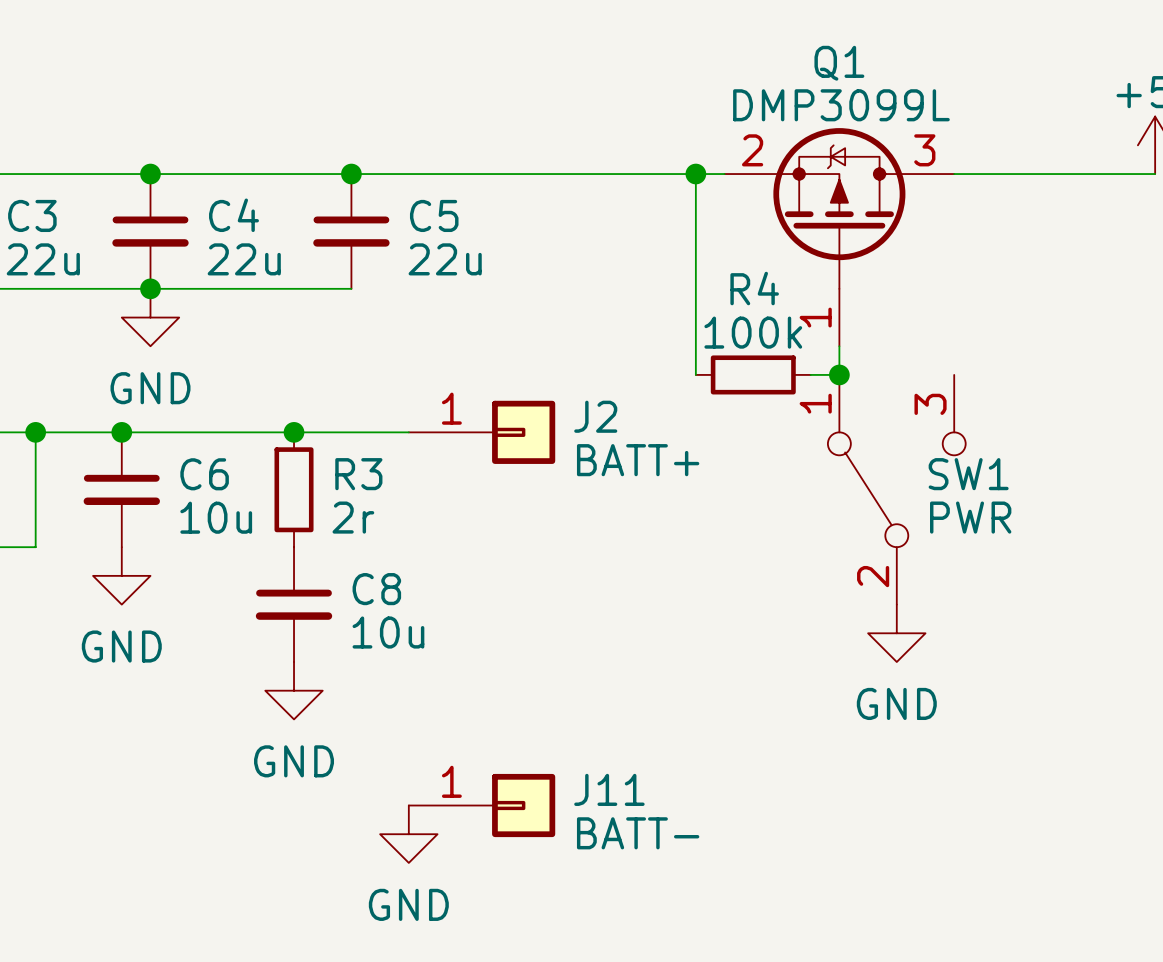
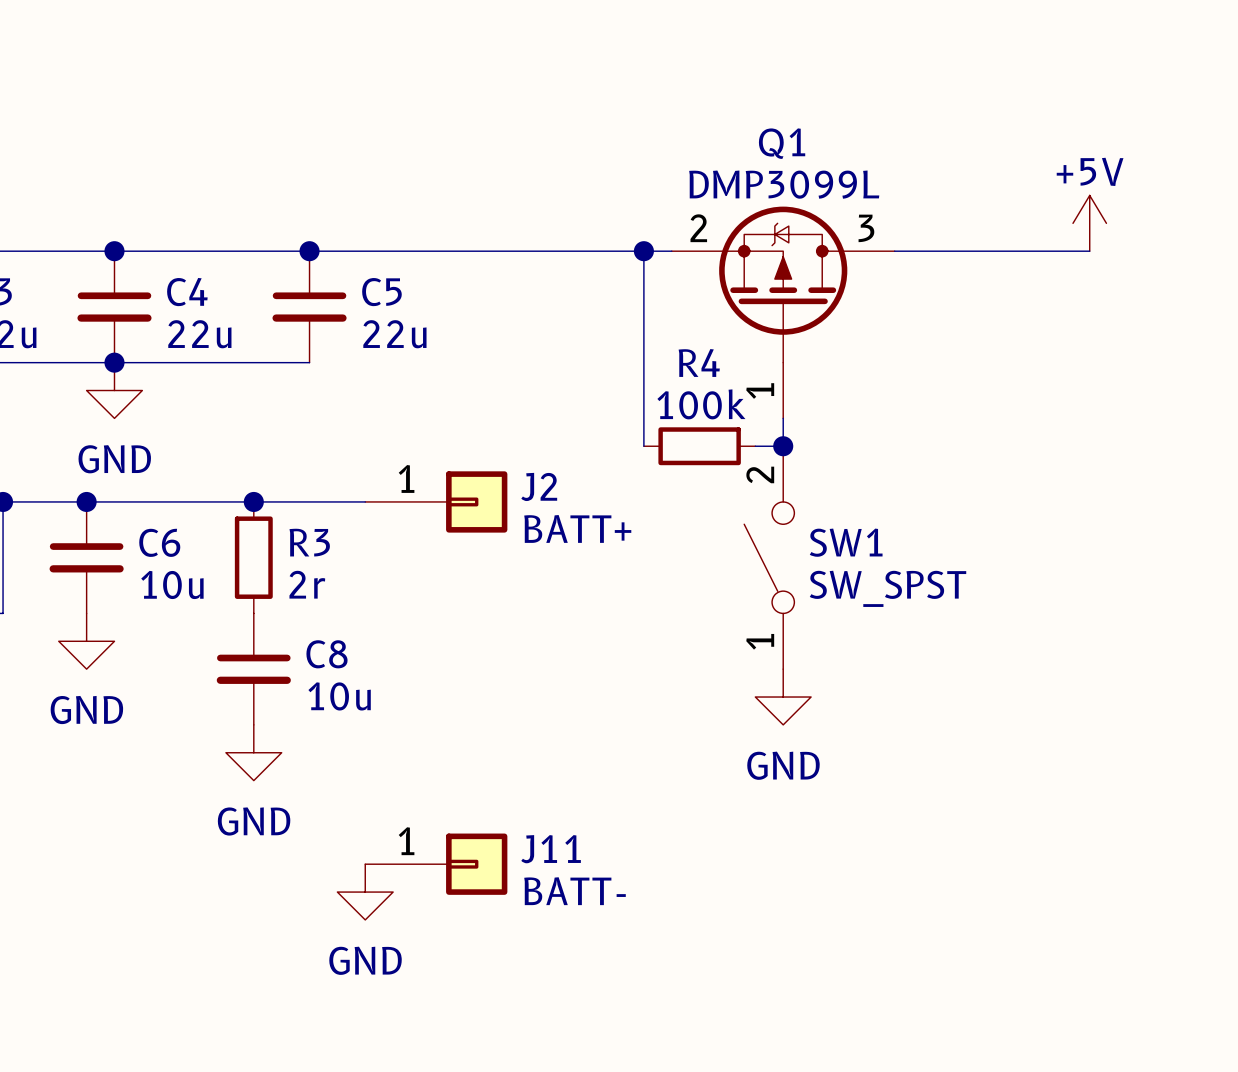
SW1 symbol: [827, 374, 966, 605] -> [744, 446, 795, 670]
SW1 value: PWR (970, 517) -> SW_SPST (888, 588)
power symbol position: GND (896, 633) -> GND (783, 697)

